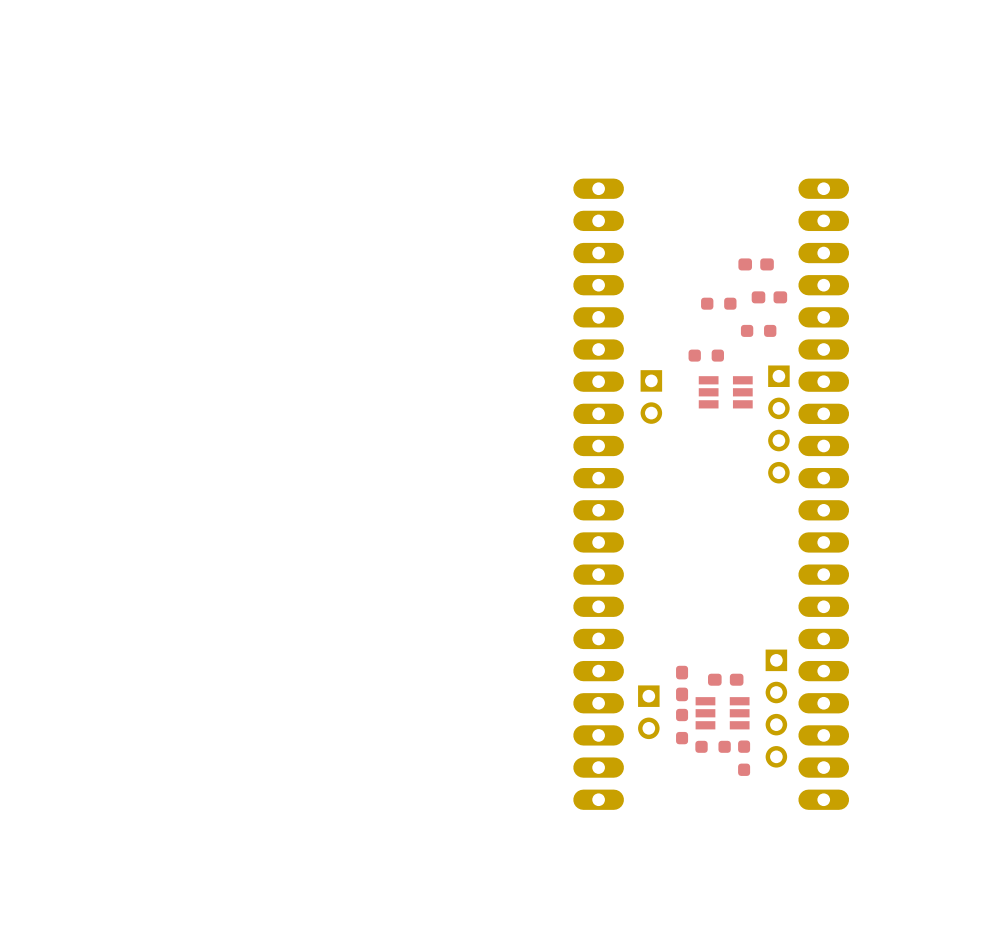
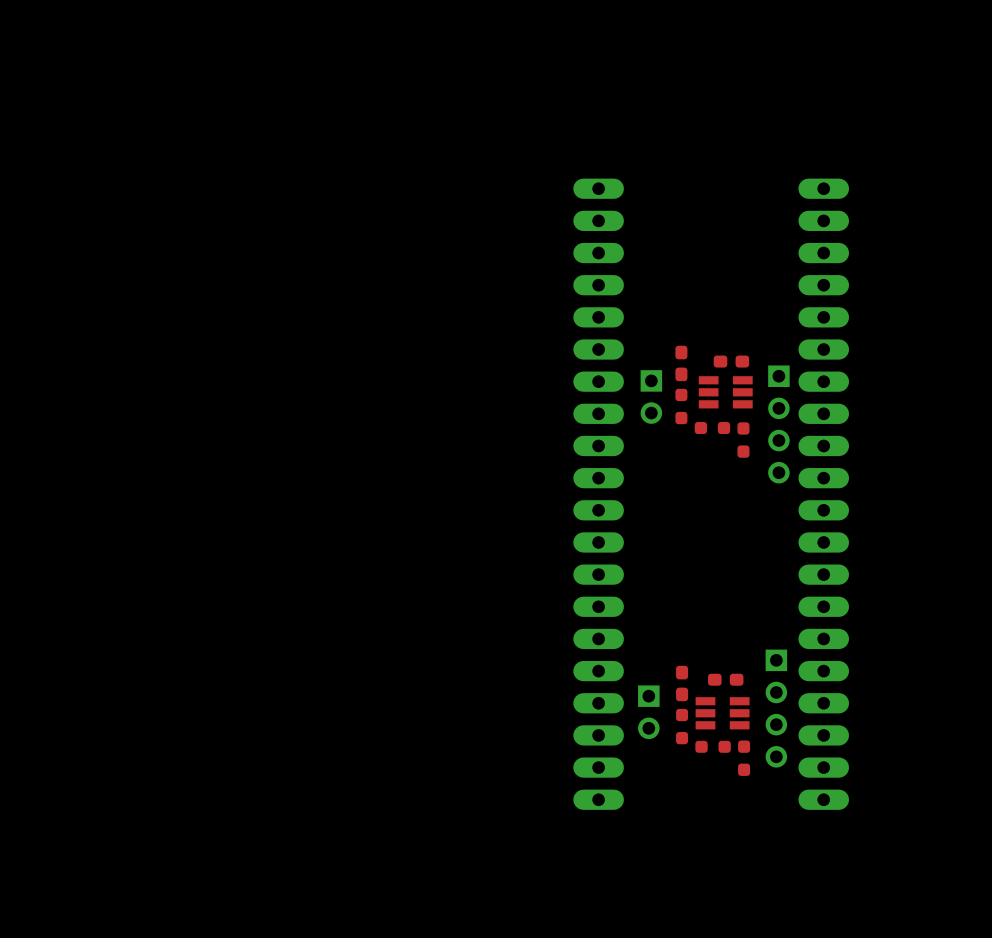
part: (756, 264) -> none
part: (769, 297) -> none
part: (718, 303) -> none
part: (758, 330) -> none
part: (706, 355) -> none
part: none -> (731, 361)
part: none -> (681, 363)
part: none -> (681, 406)
part: none -> (712, 428)
part: none -> (743, 440)

